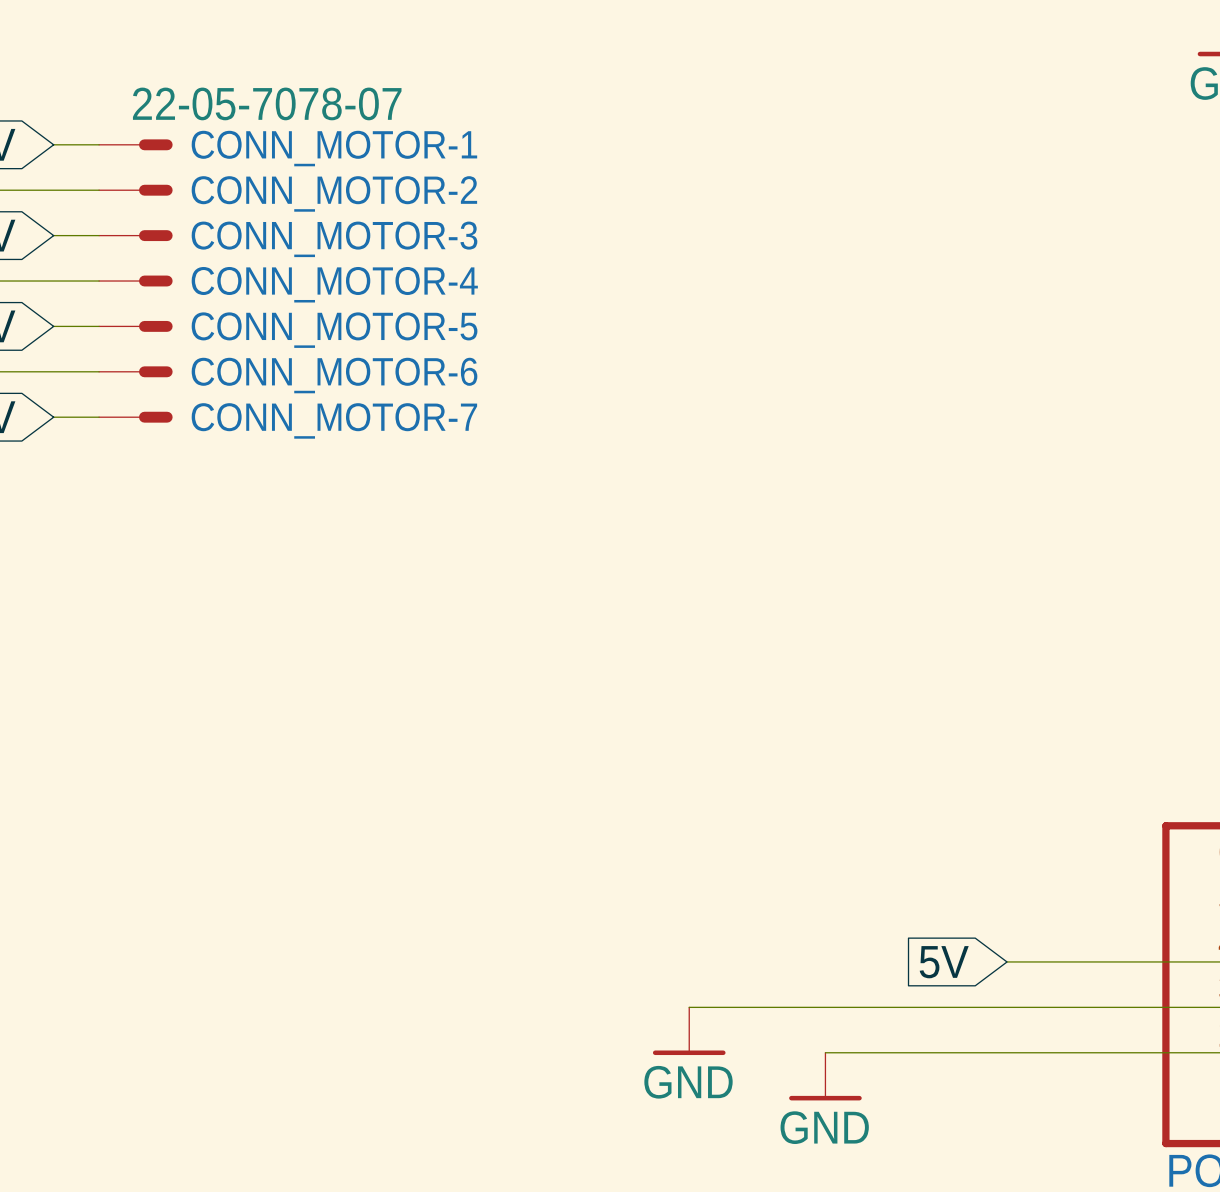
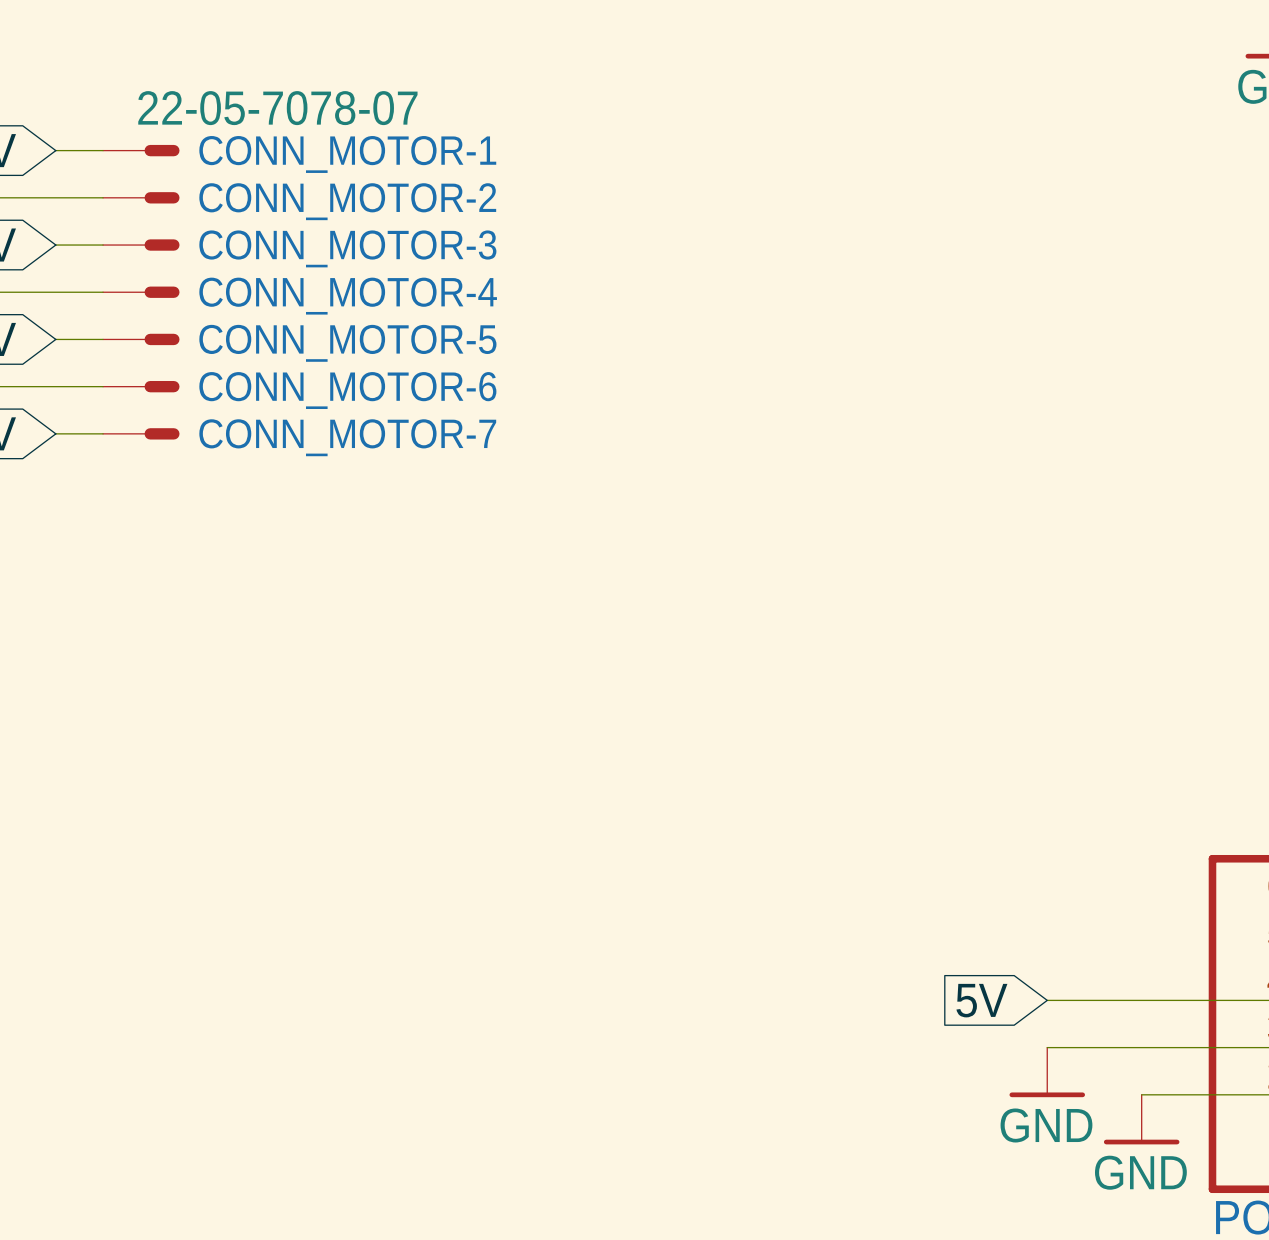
wire: (689, 1007) (1007, 1007) -> none
power symbol: GND (689, 1031) -> none
power symbol: none -> GND (1047, 1072)
wire: (825, 1052) (1097, 1052) -> none
power symbol: GND (825, 1076) -> none
power symbol: none -> GND (1141, 1119)

